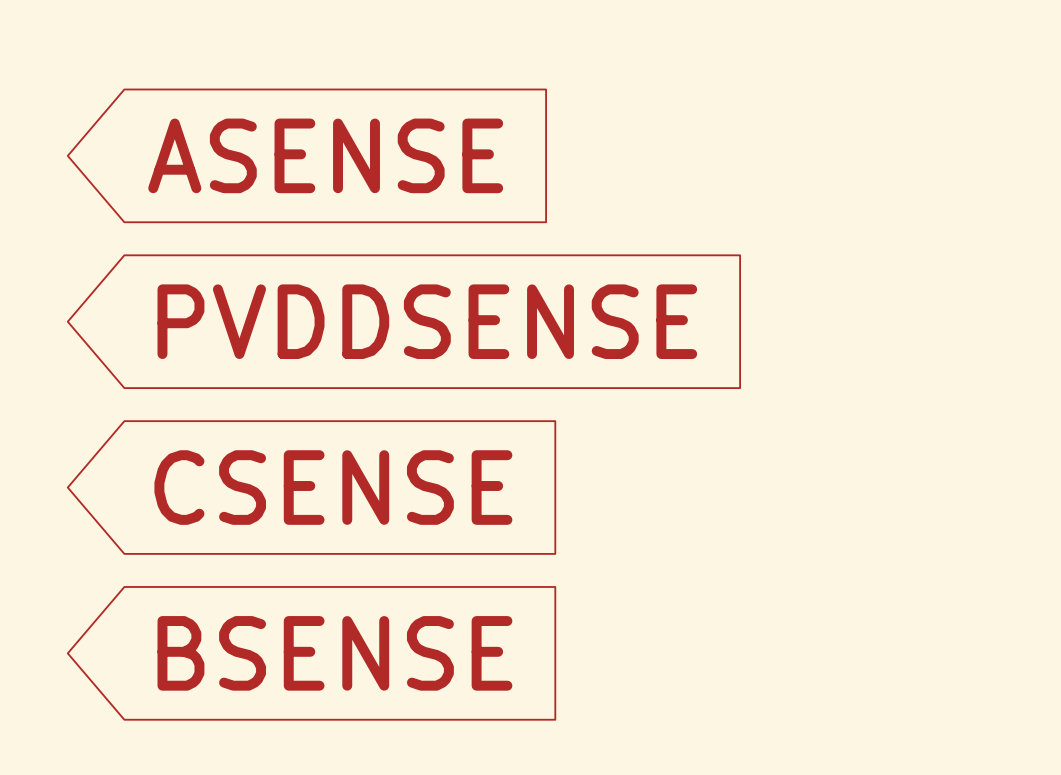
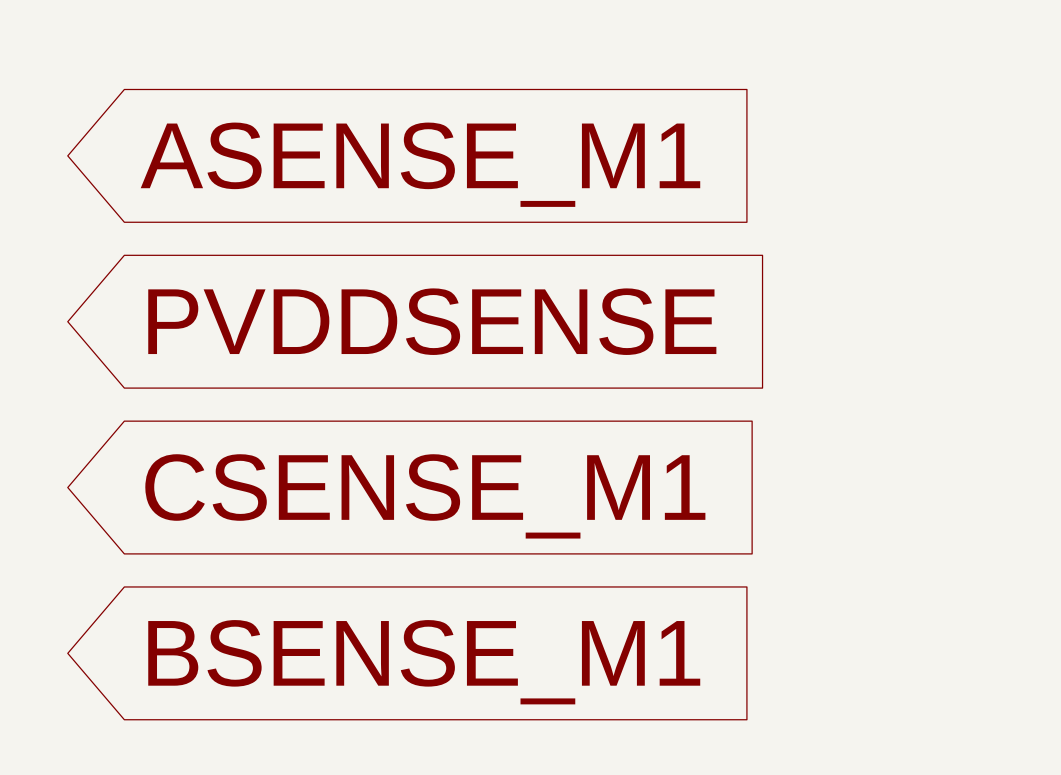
global label: ASENSE (325, 155) -> ASENSE_M1 (420, 164)
global label: CSENSE (333, 487) -> CSENSE_M1 (425, 496)
global label: BSENSE (334, 653) -> BSENSE_M1 (424, 662)

